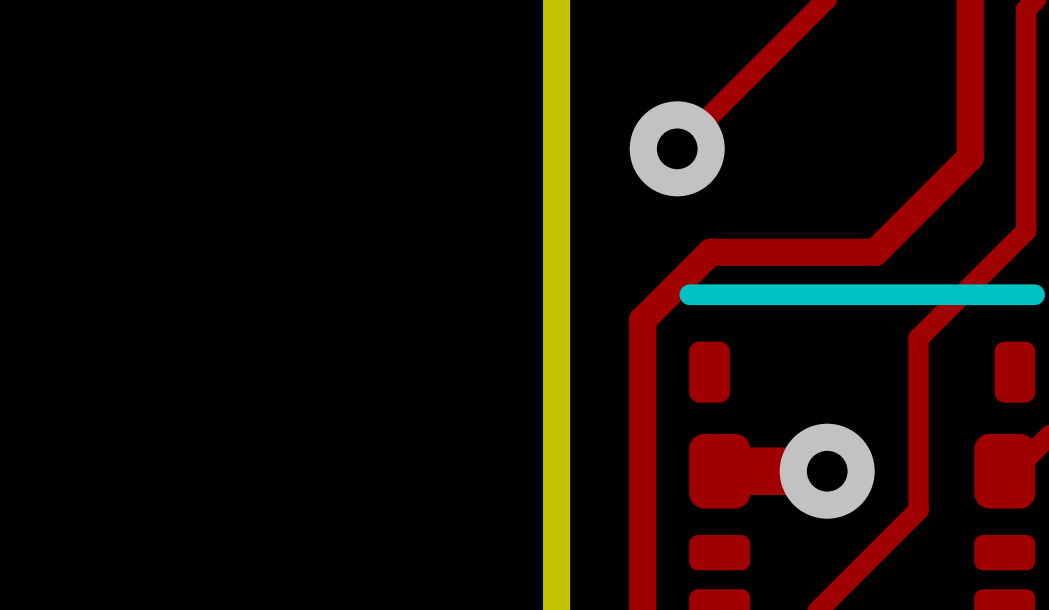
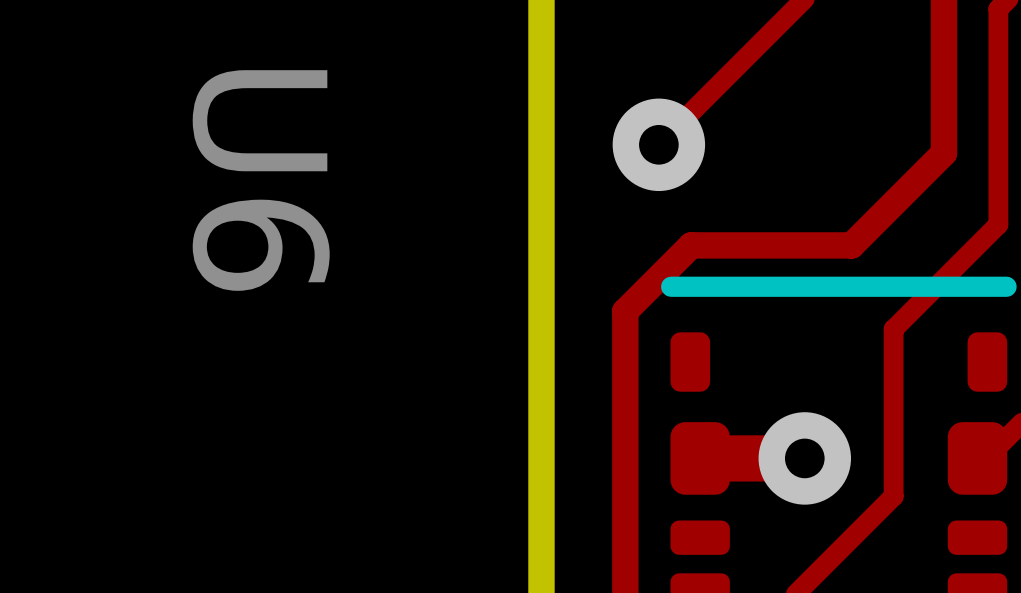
U6 name: none -> U6 (261, 180)

